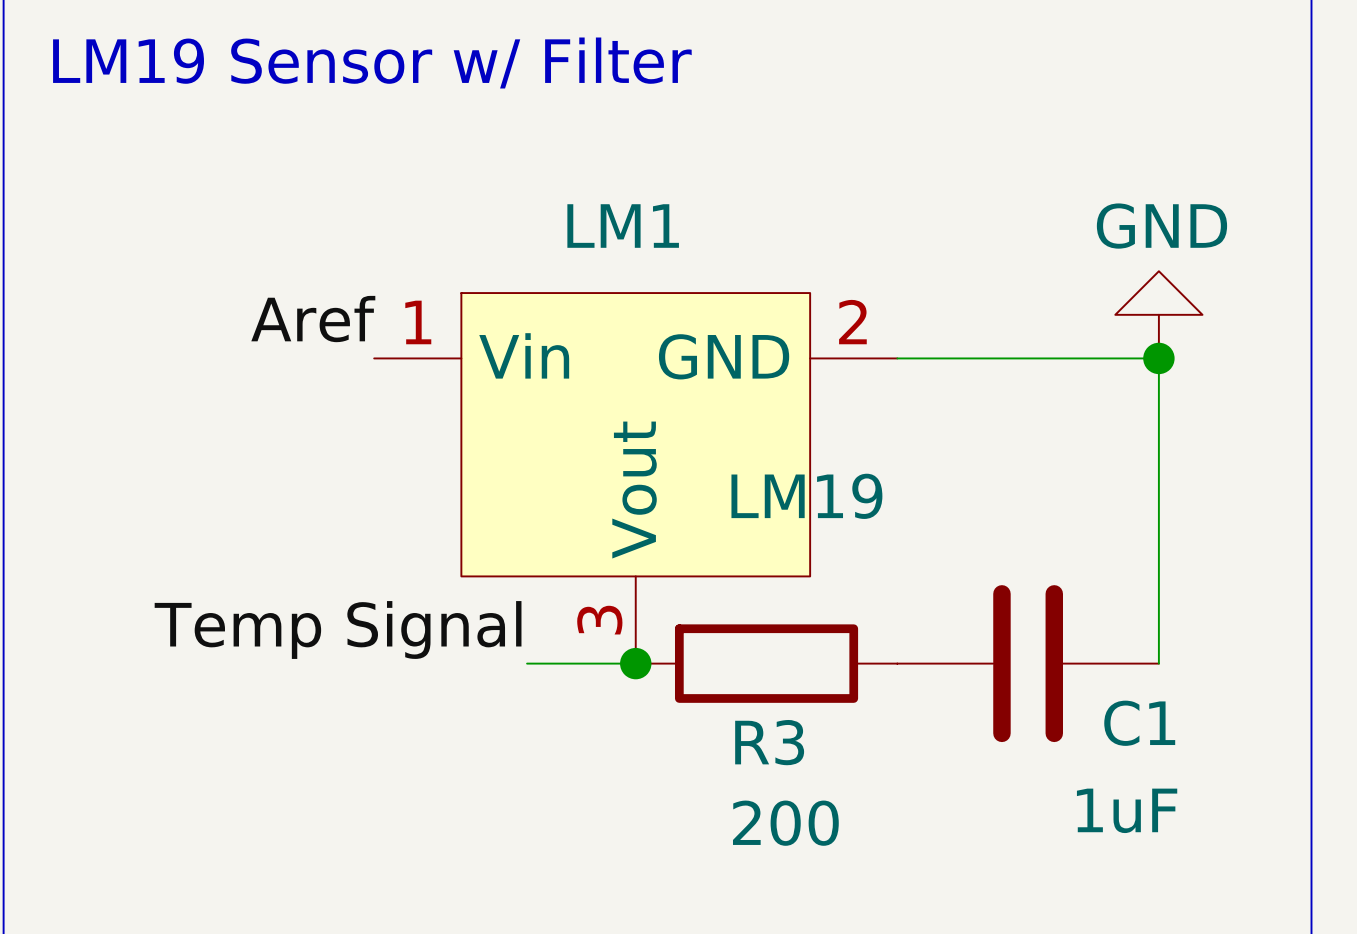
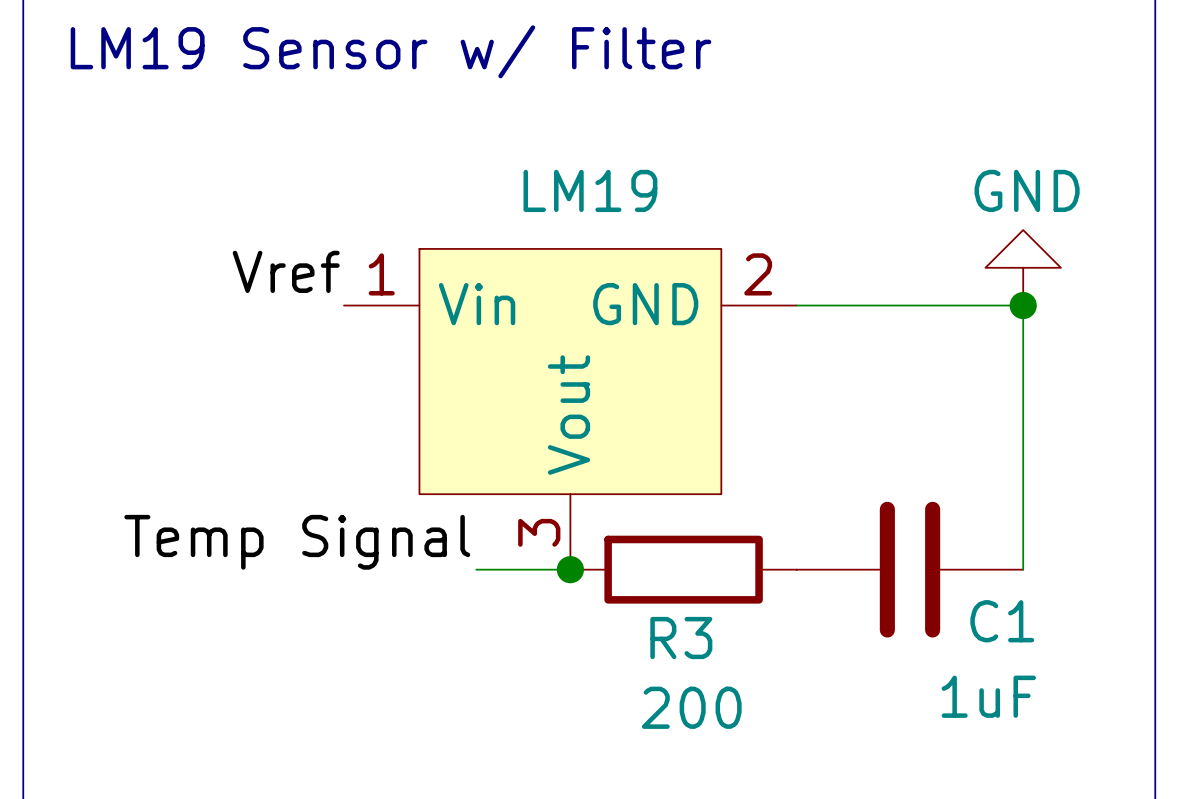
LM1 name: LM1 (623, 226) -> none
label: Aref (313, 319) -> Vref (286, 271)
LM1 value position: LM19 (806, 496) -> LM19 (590, 190)

